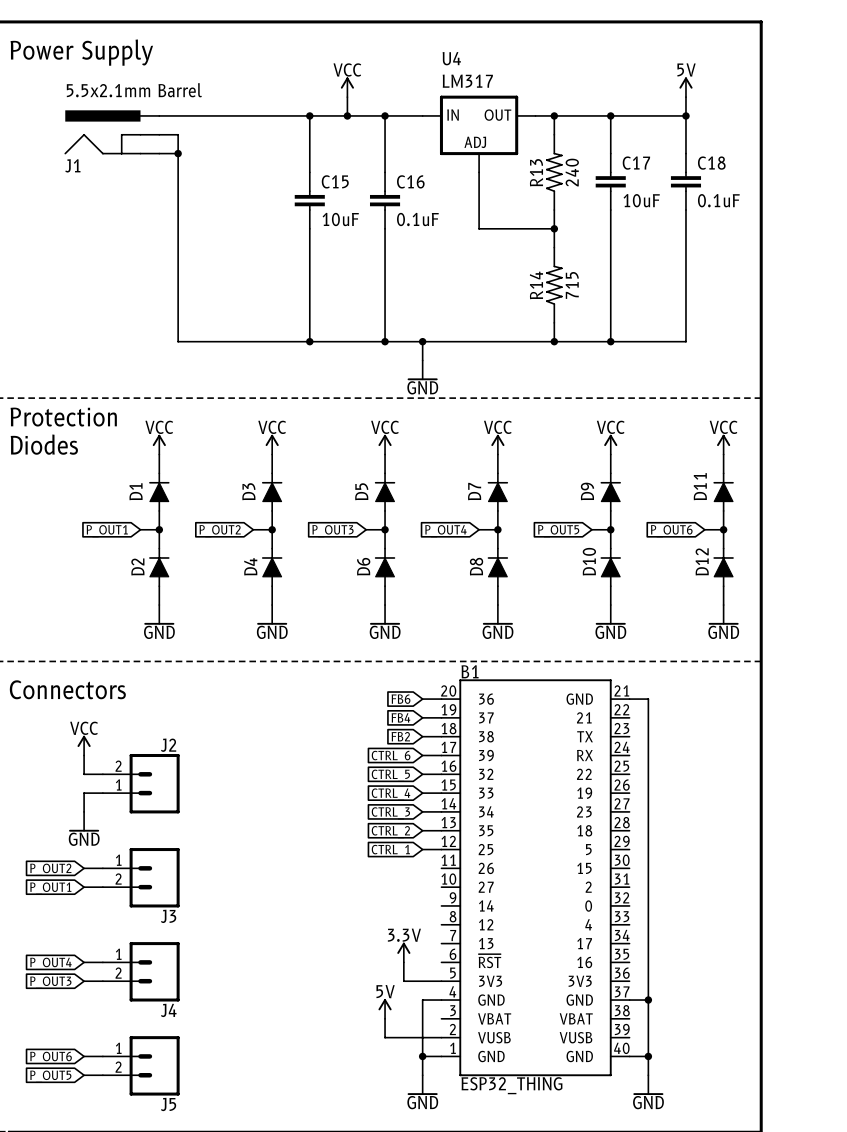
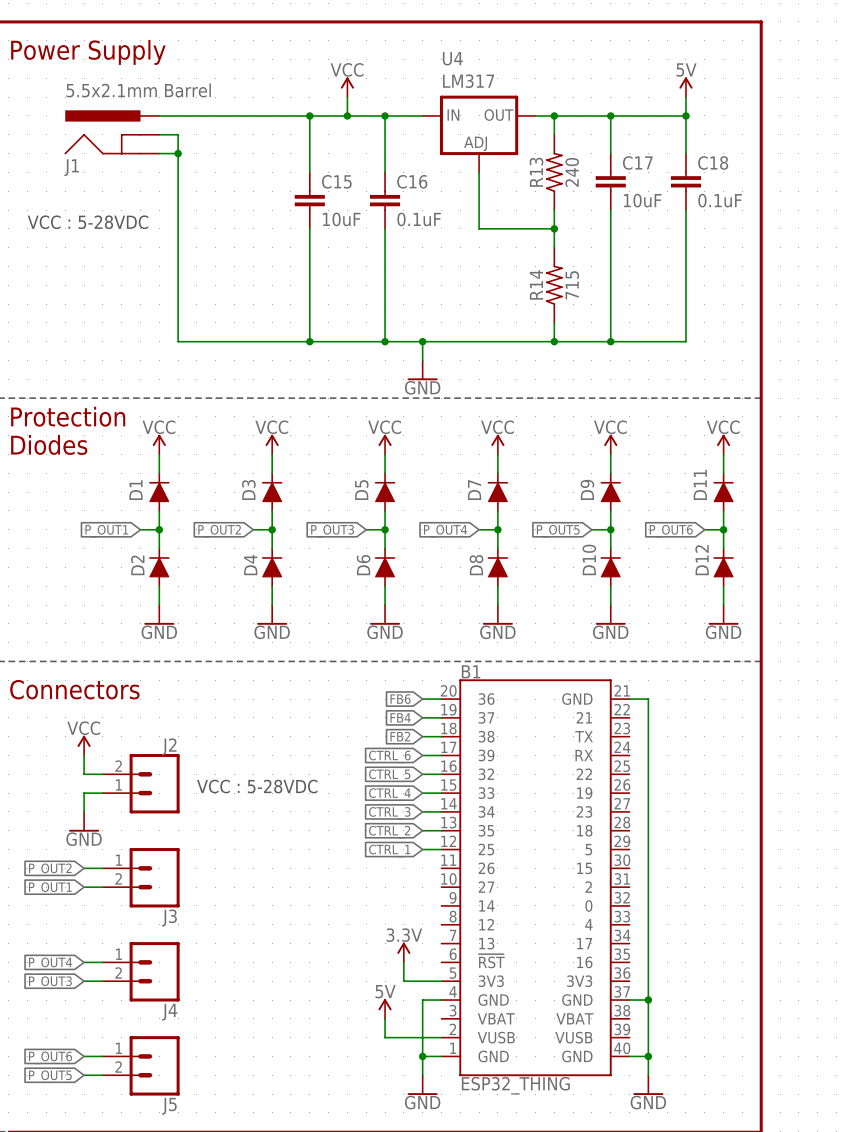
text: none -> VCC : 5-28VDC (88, 222)
text: none -> VCC : 5-28VDC (257, 786)

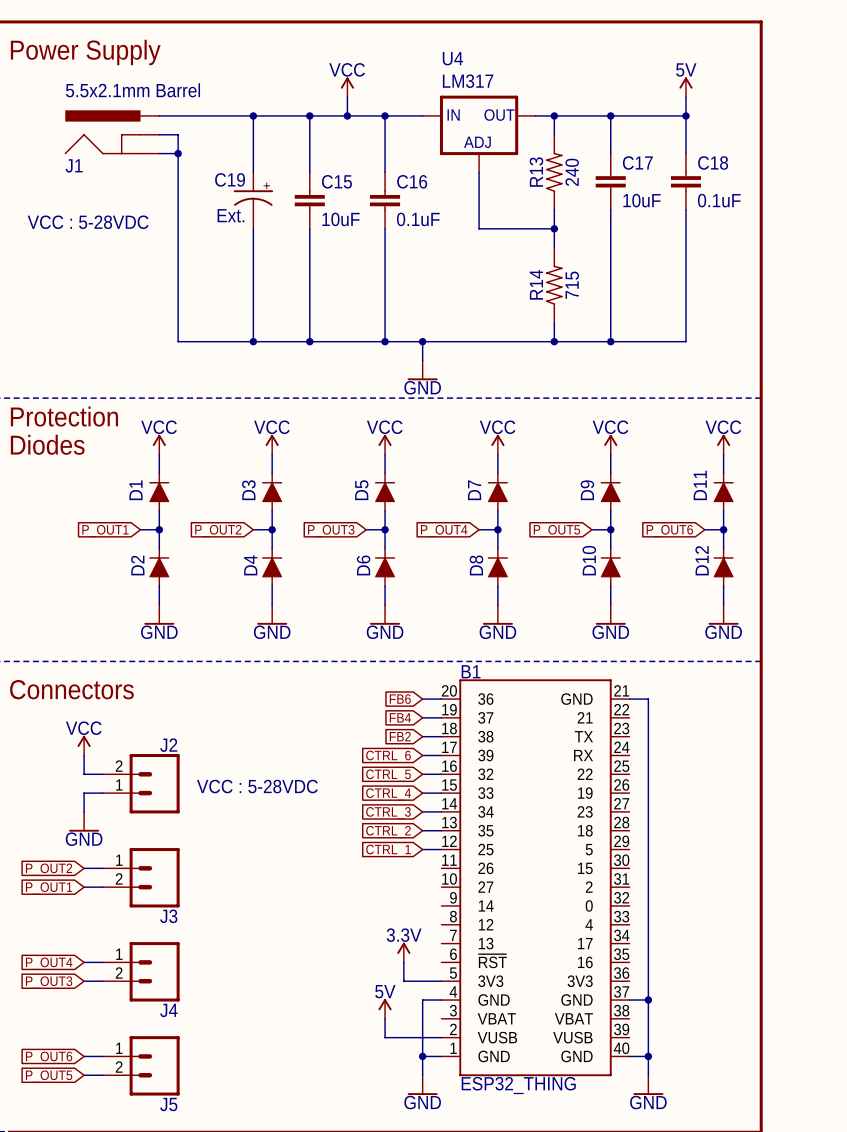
wire: none -> (253, 115) (253, 172)
junction: none -> (253, 115)
C19: none -> Ext. (253, 200)
wire: none -> (253, 228) (253, 341)
junction: none -> (253, 341)

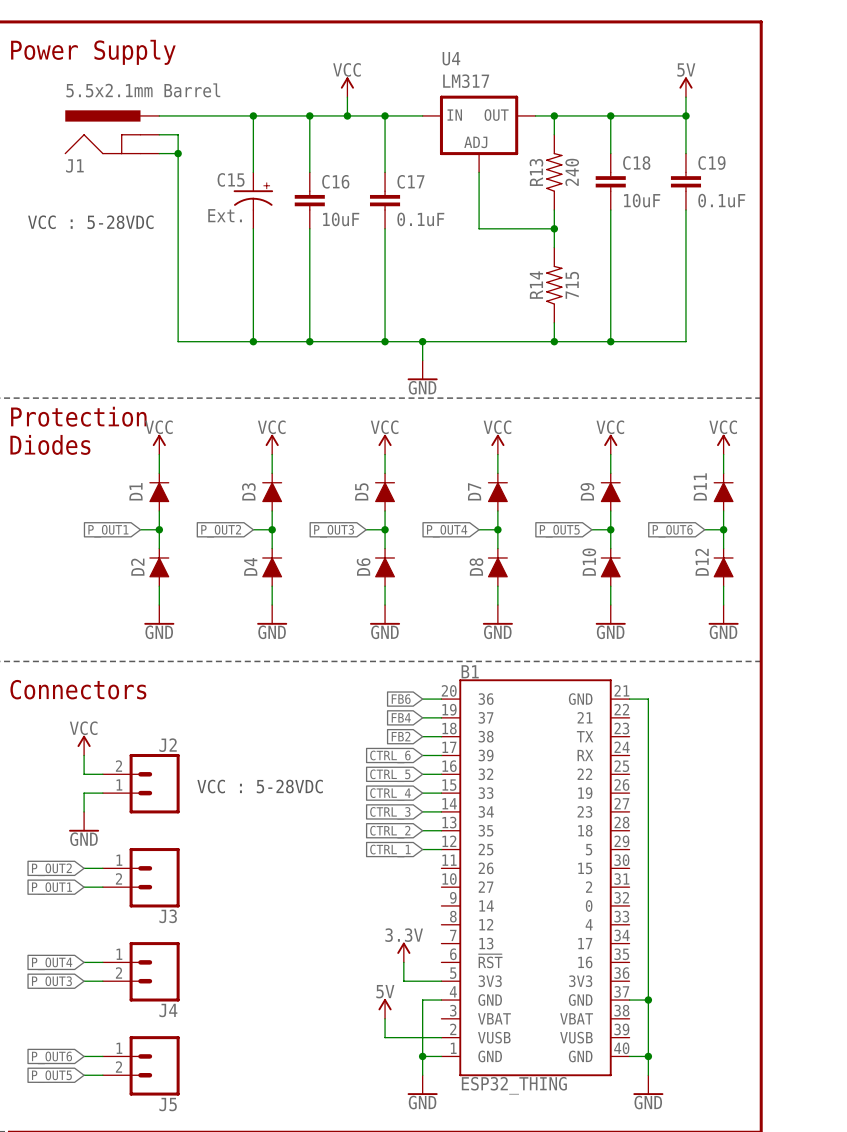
C17 name: C17 (637, 162) -> C18 (636, 163)
C18 name: C18 (713, 162) -> C19 (711, 163)
C19 name: C19 (230, 179) -> C15 (231, 179)
C15 name: C15 (336, 181) -> C16 (335, 181)
C16 name: C16 (412, 181) -> C17 (410, 181)

